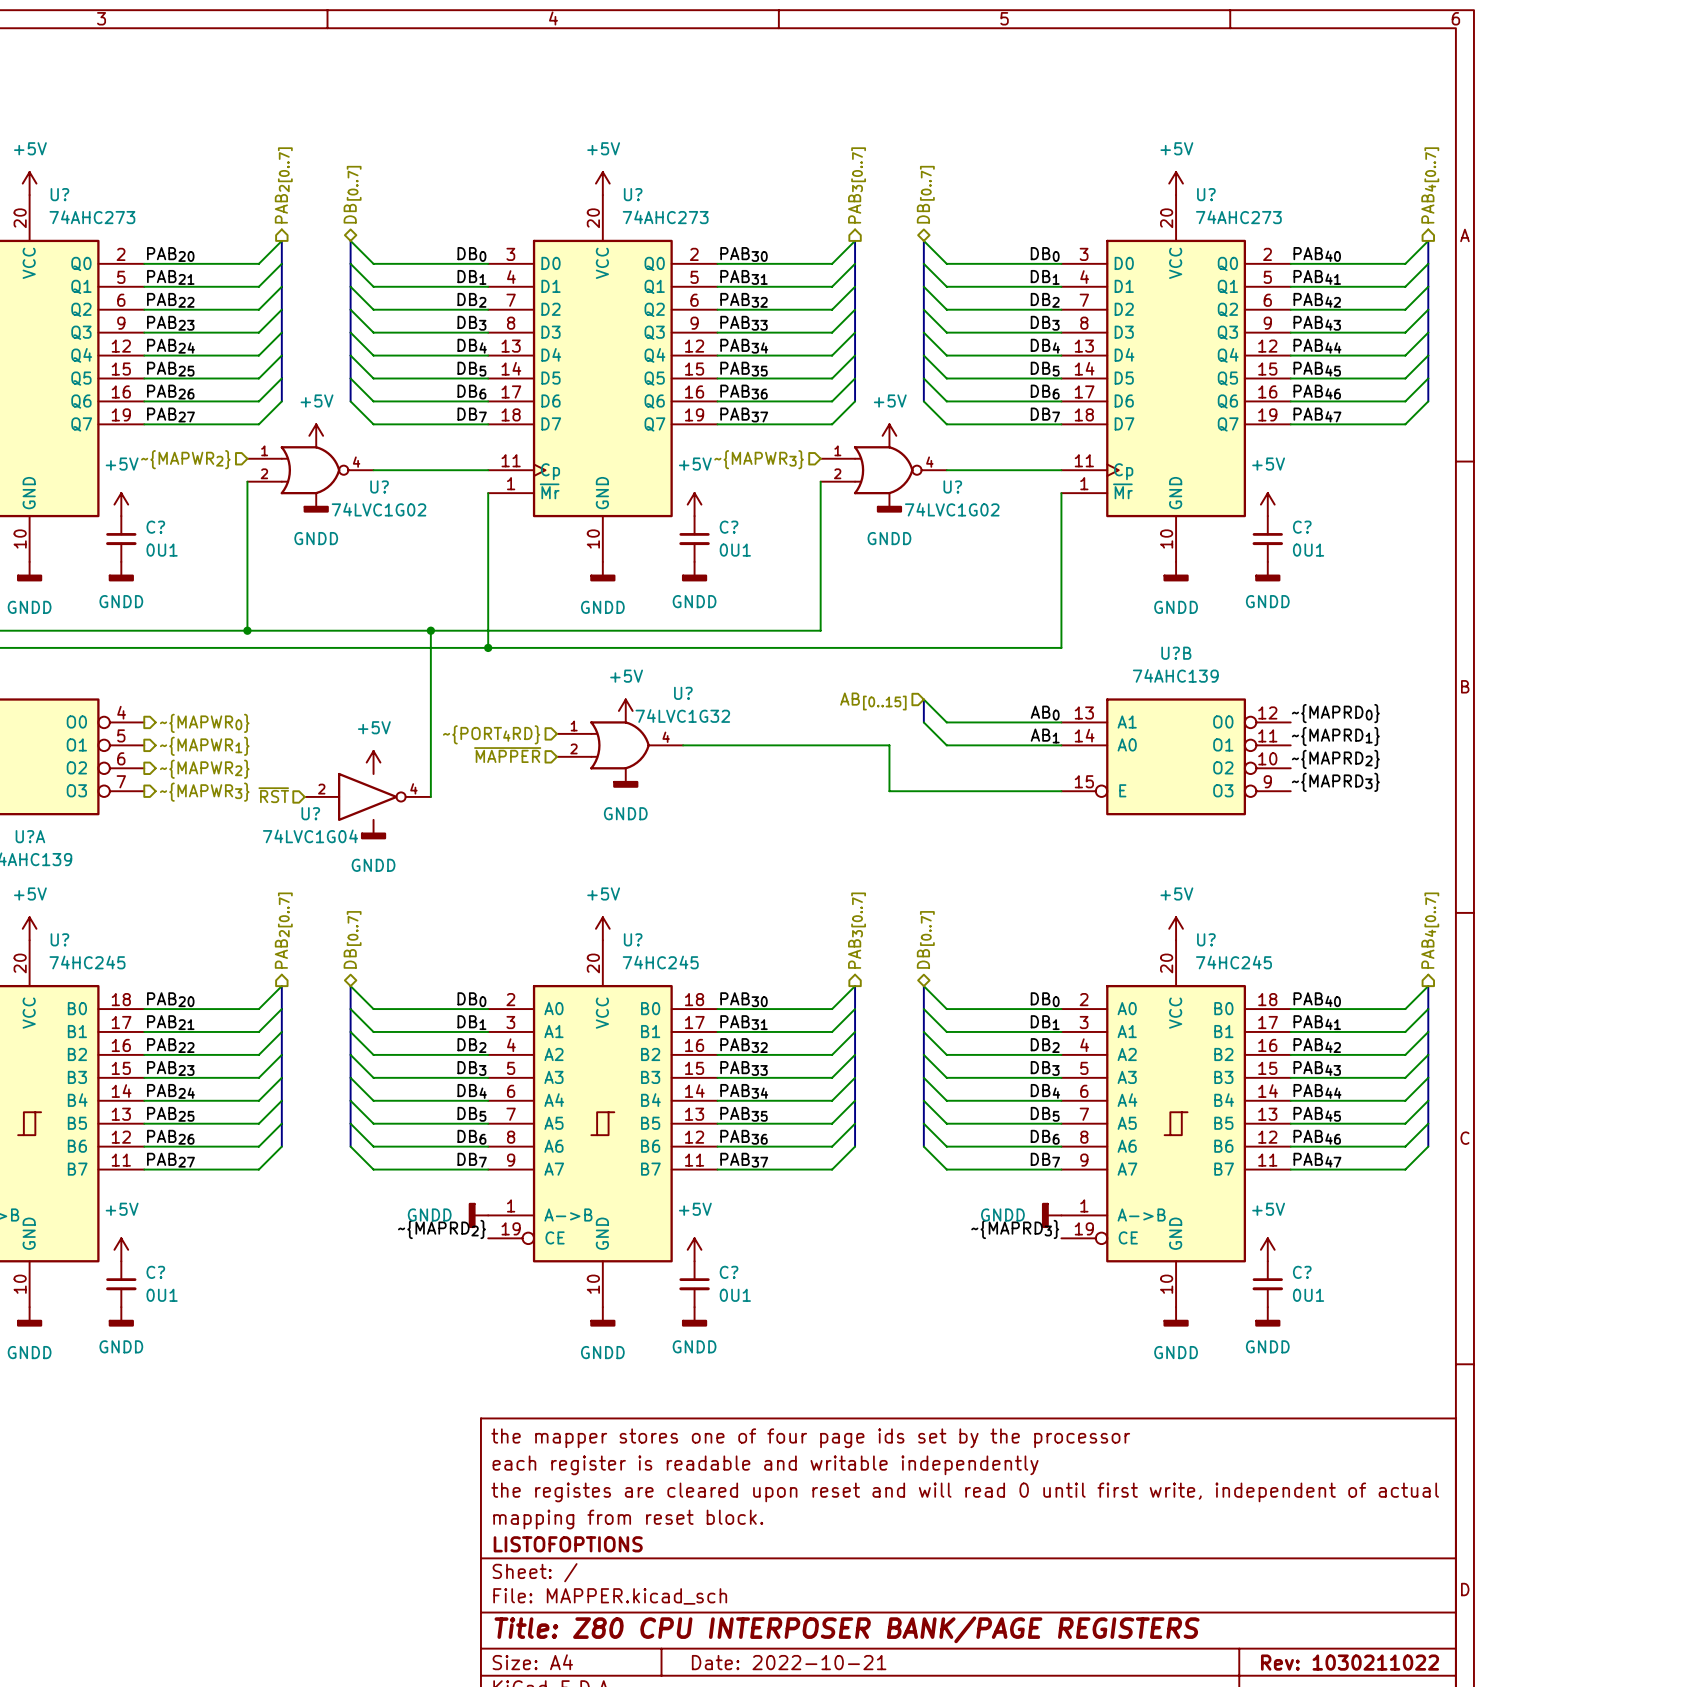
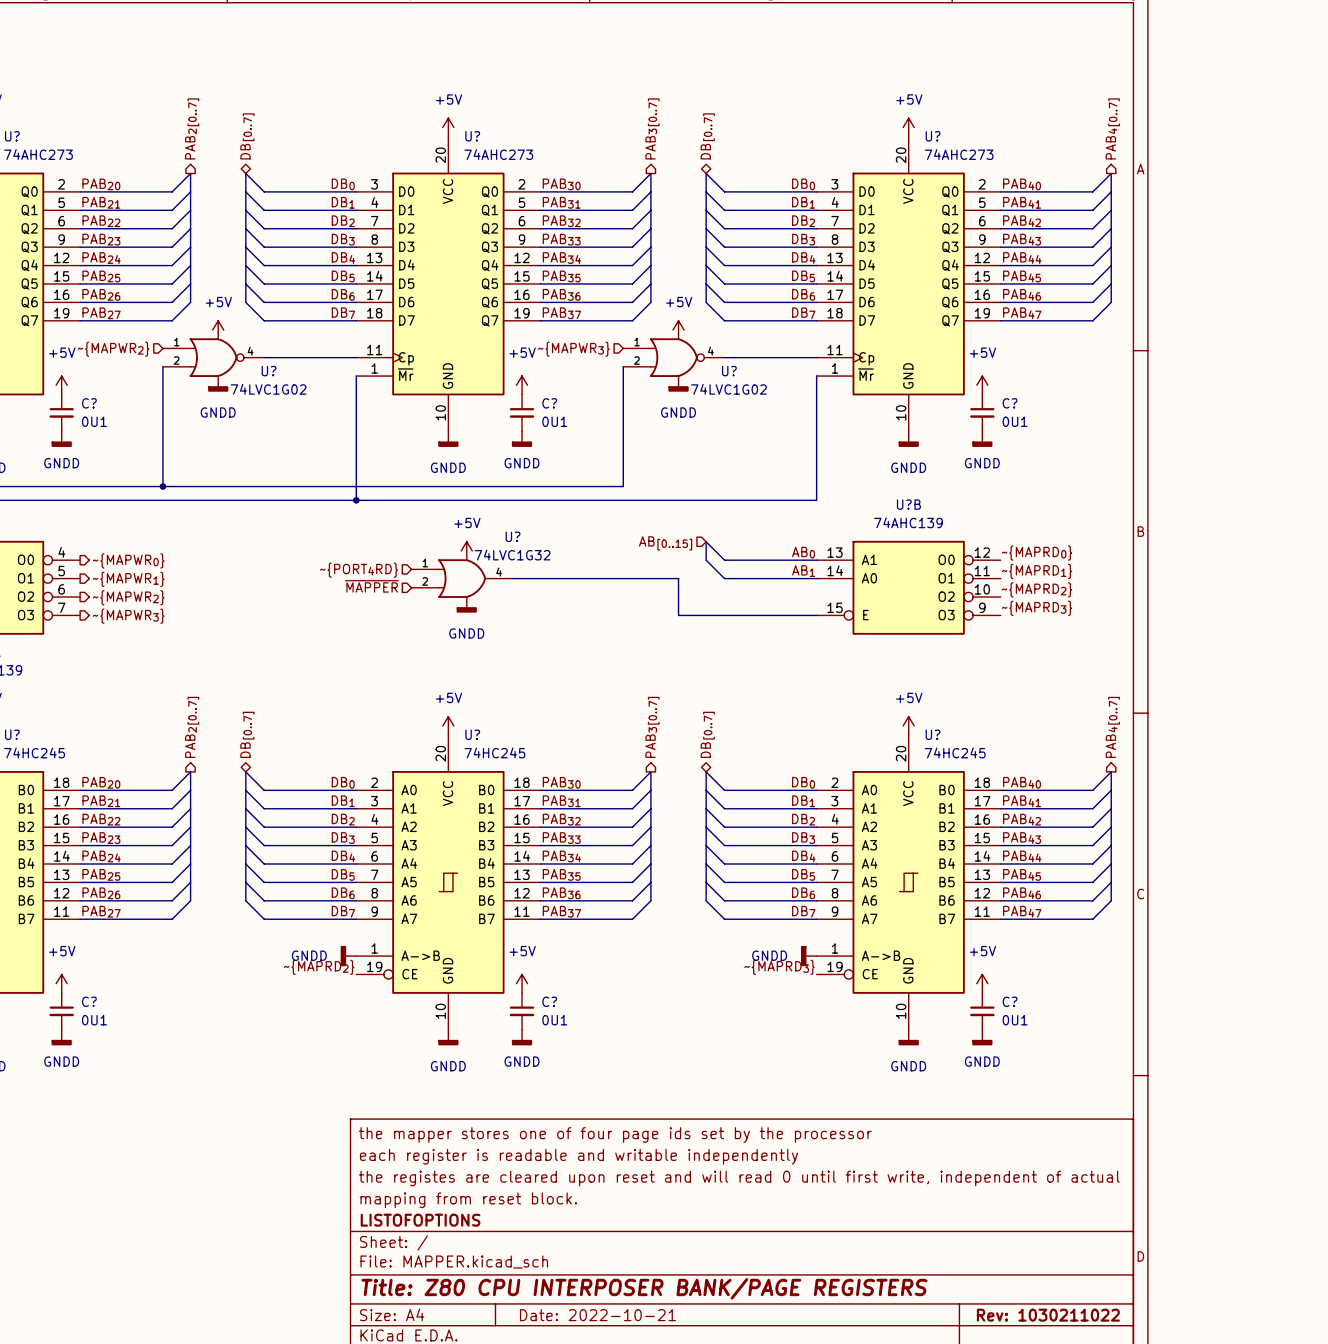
wire: (430, 630) (430, 796) -> none
junction: (430, 630) -> none
power symbol: +5V (373, 762) -> none
hierarchical label: ~{RST} (273, 795) -> none
U?: 74LVC1G04 (367, 796) -> none
power symbol: GNDD (373, 829) -> none

